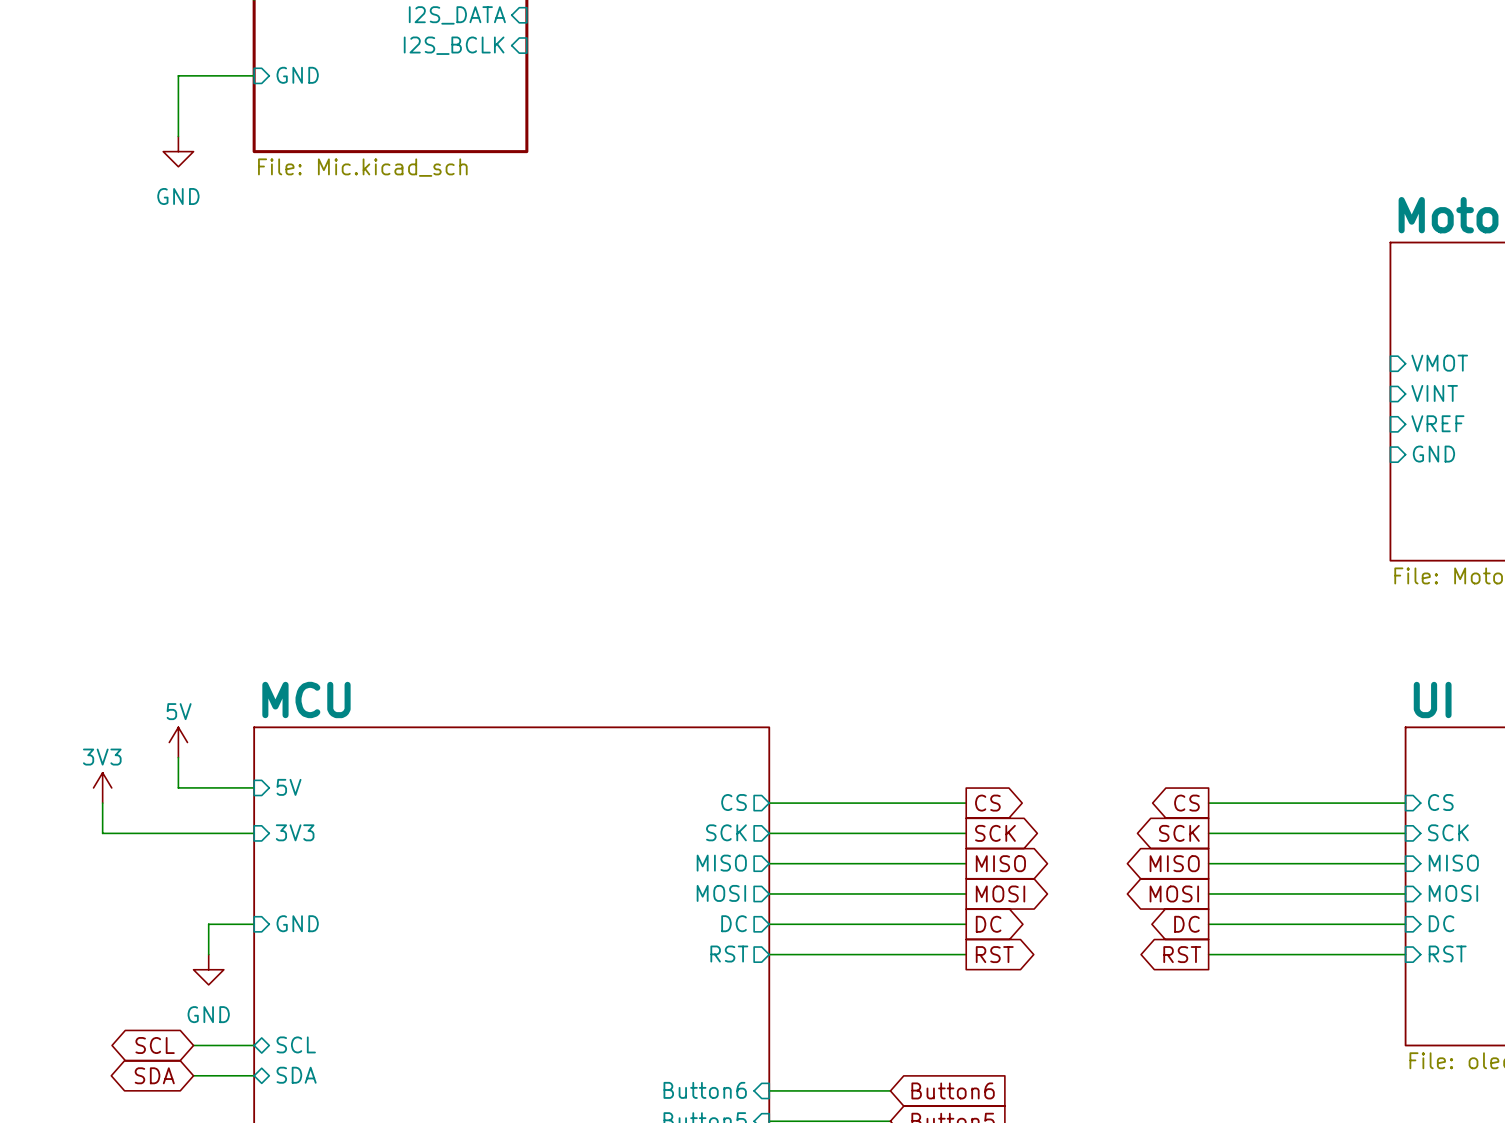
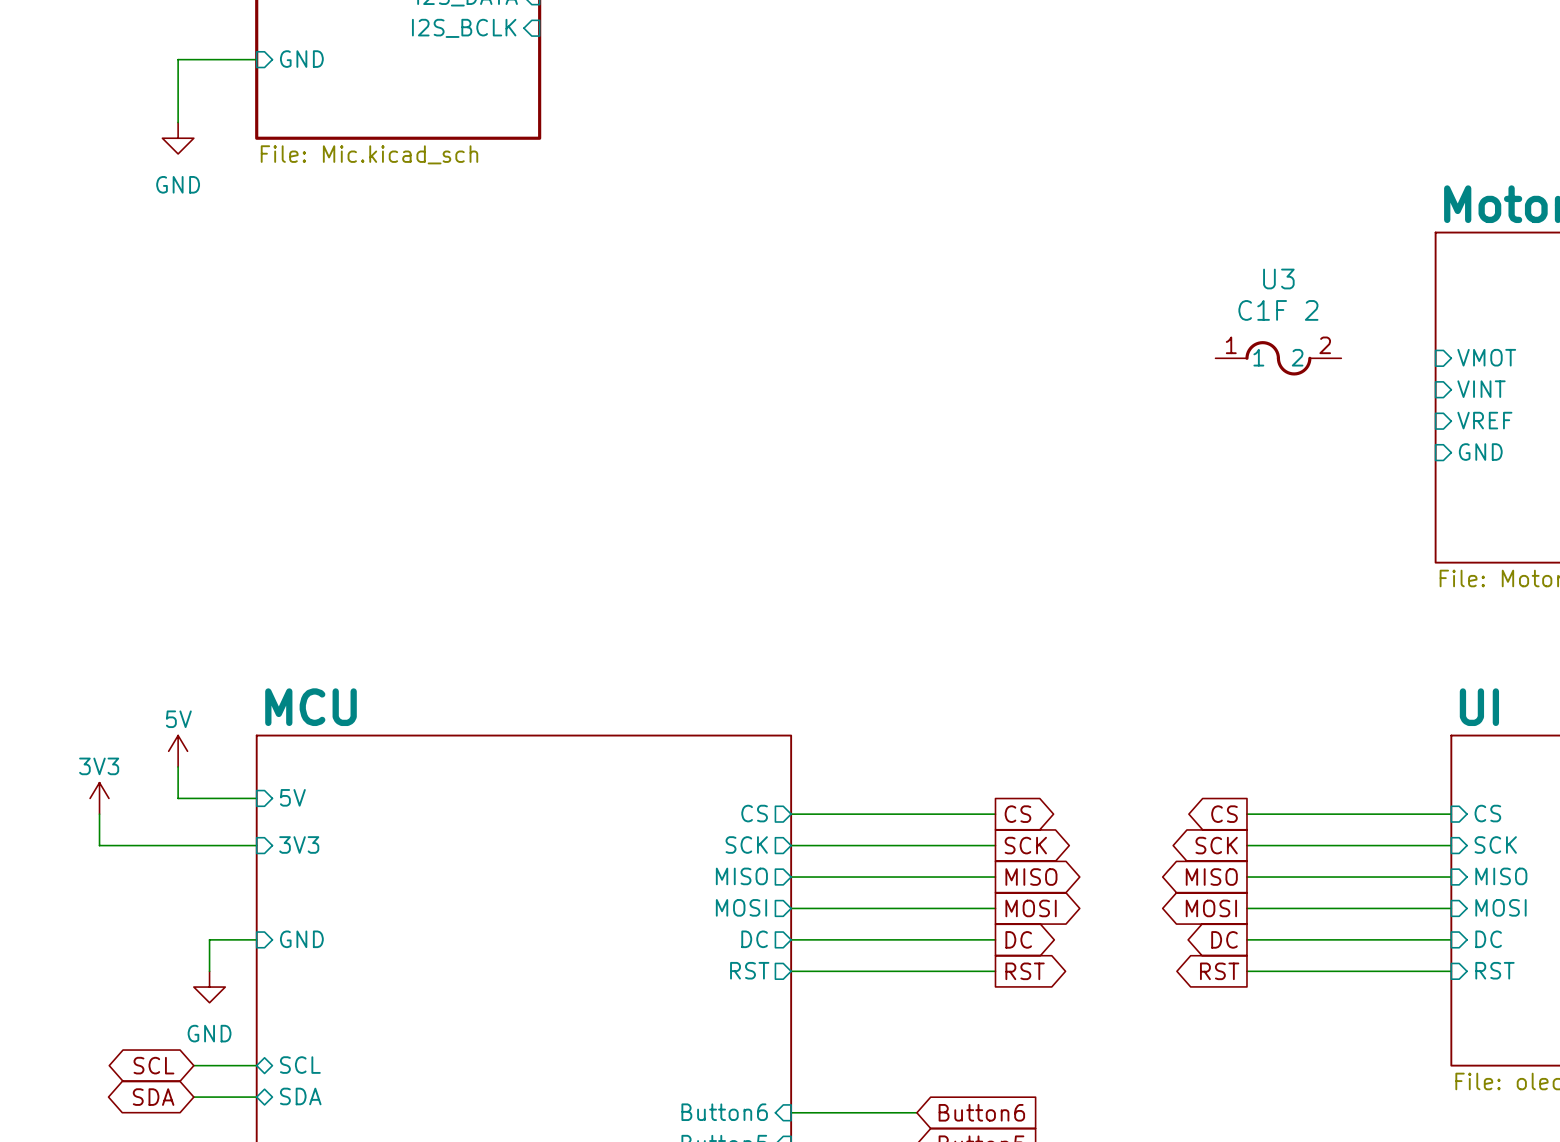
U3: none -> C1F 2 (1278, 358)

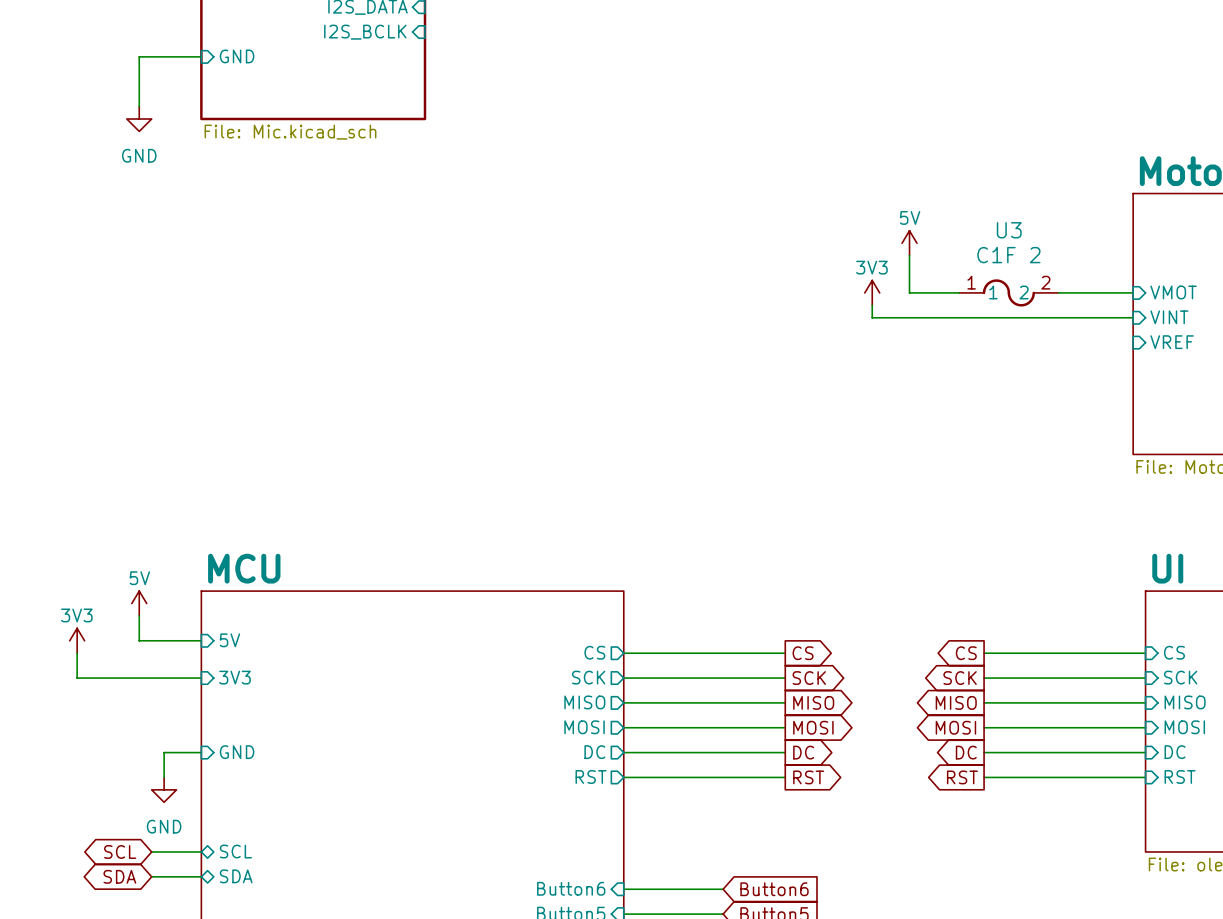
power symbol: none -> 5V (909, 243)
wire: none -> (909, 255) (909, 292) (959, 292)
power symbol: none -> 3V3 (872, 292)
wire: none -> (1058, 292) (1133, 292)
wire: none -> (872, 305) (872, 317) (1133, 317)
sheet pin: GND (1480, 452) -> none

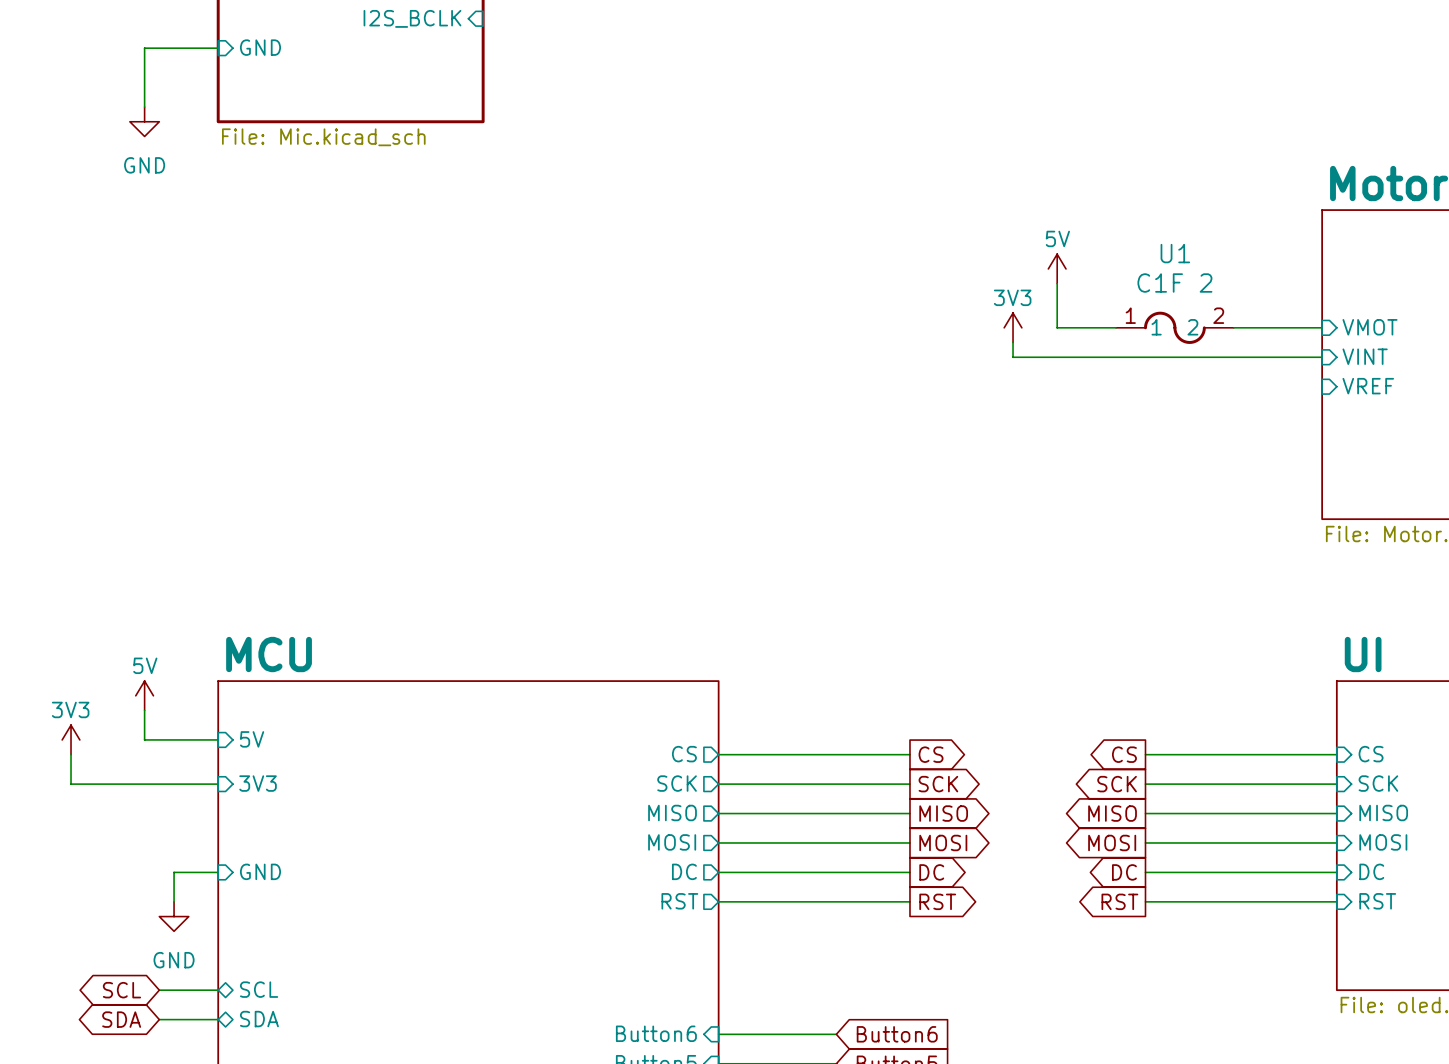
U3 name: U3 (1009, 230) -> U1 (1175, 253)

